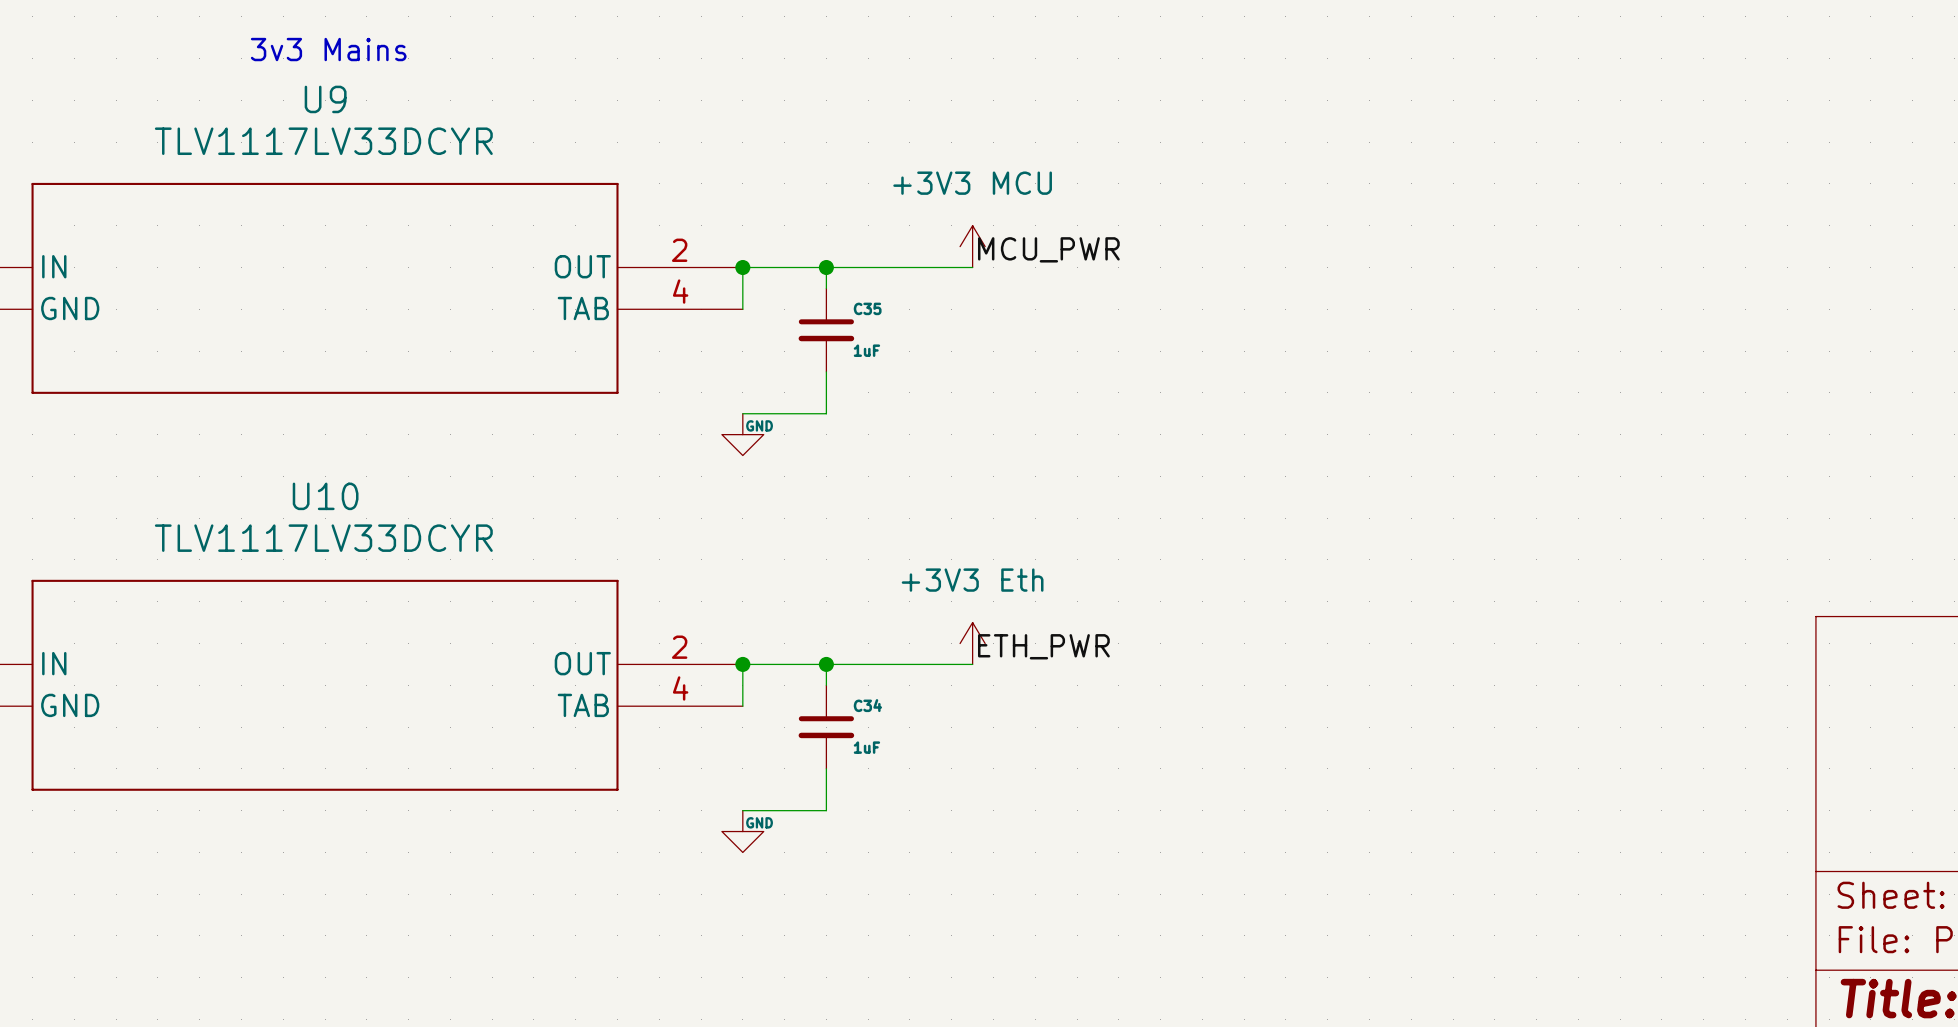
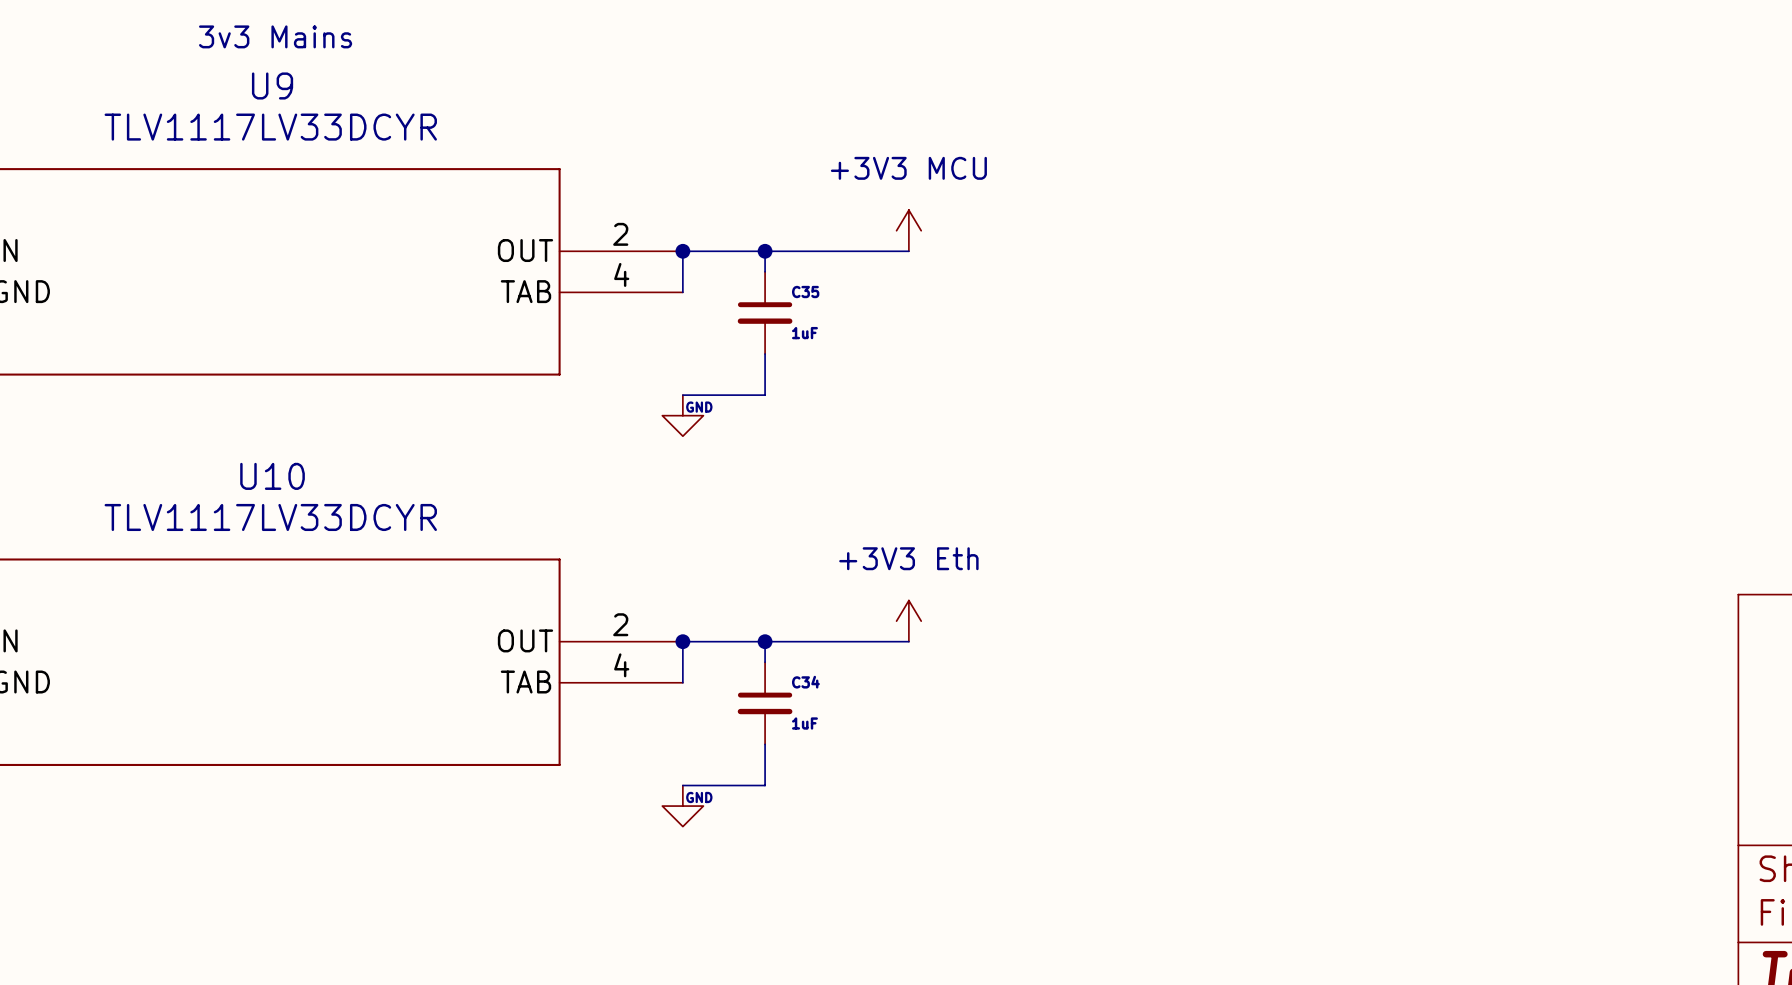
label: MCU_PWR (1048, 249) -> none
label: ETH_PWR (1043, 646) -> none

